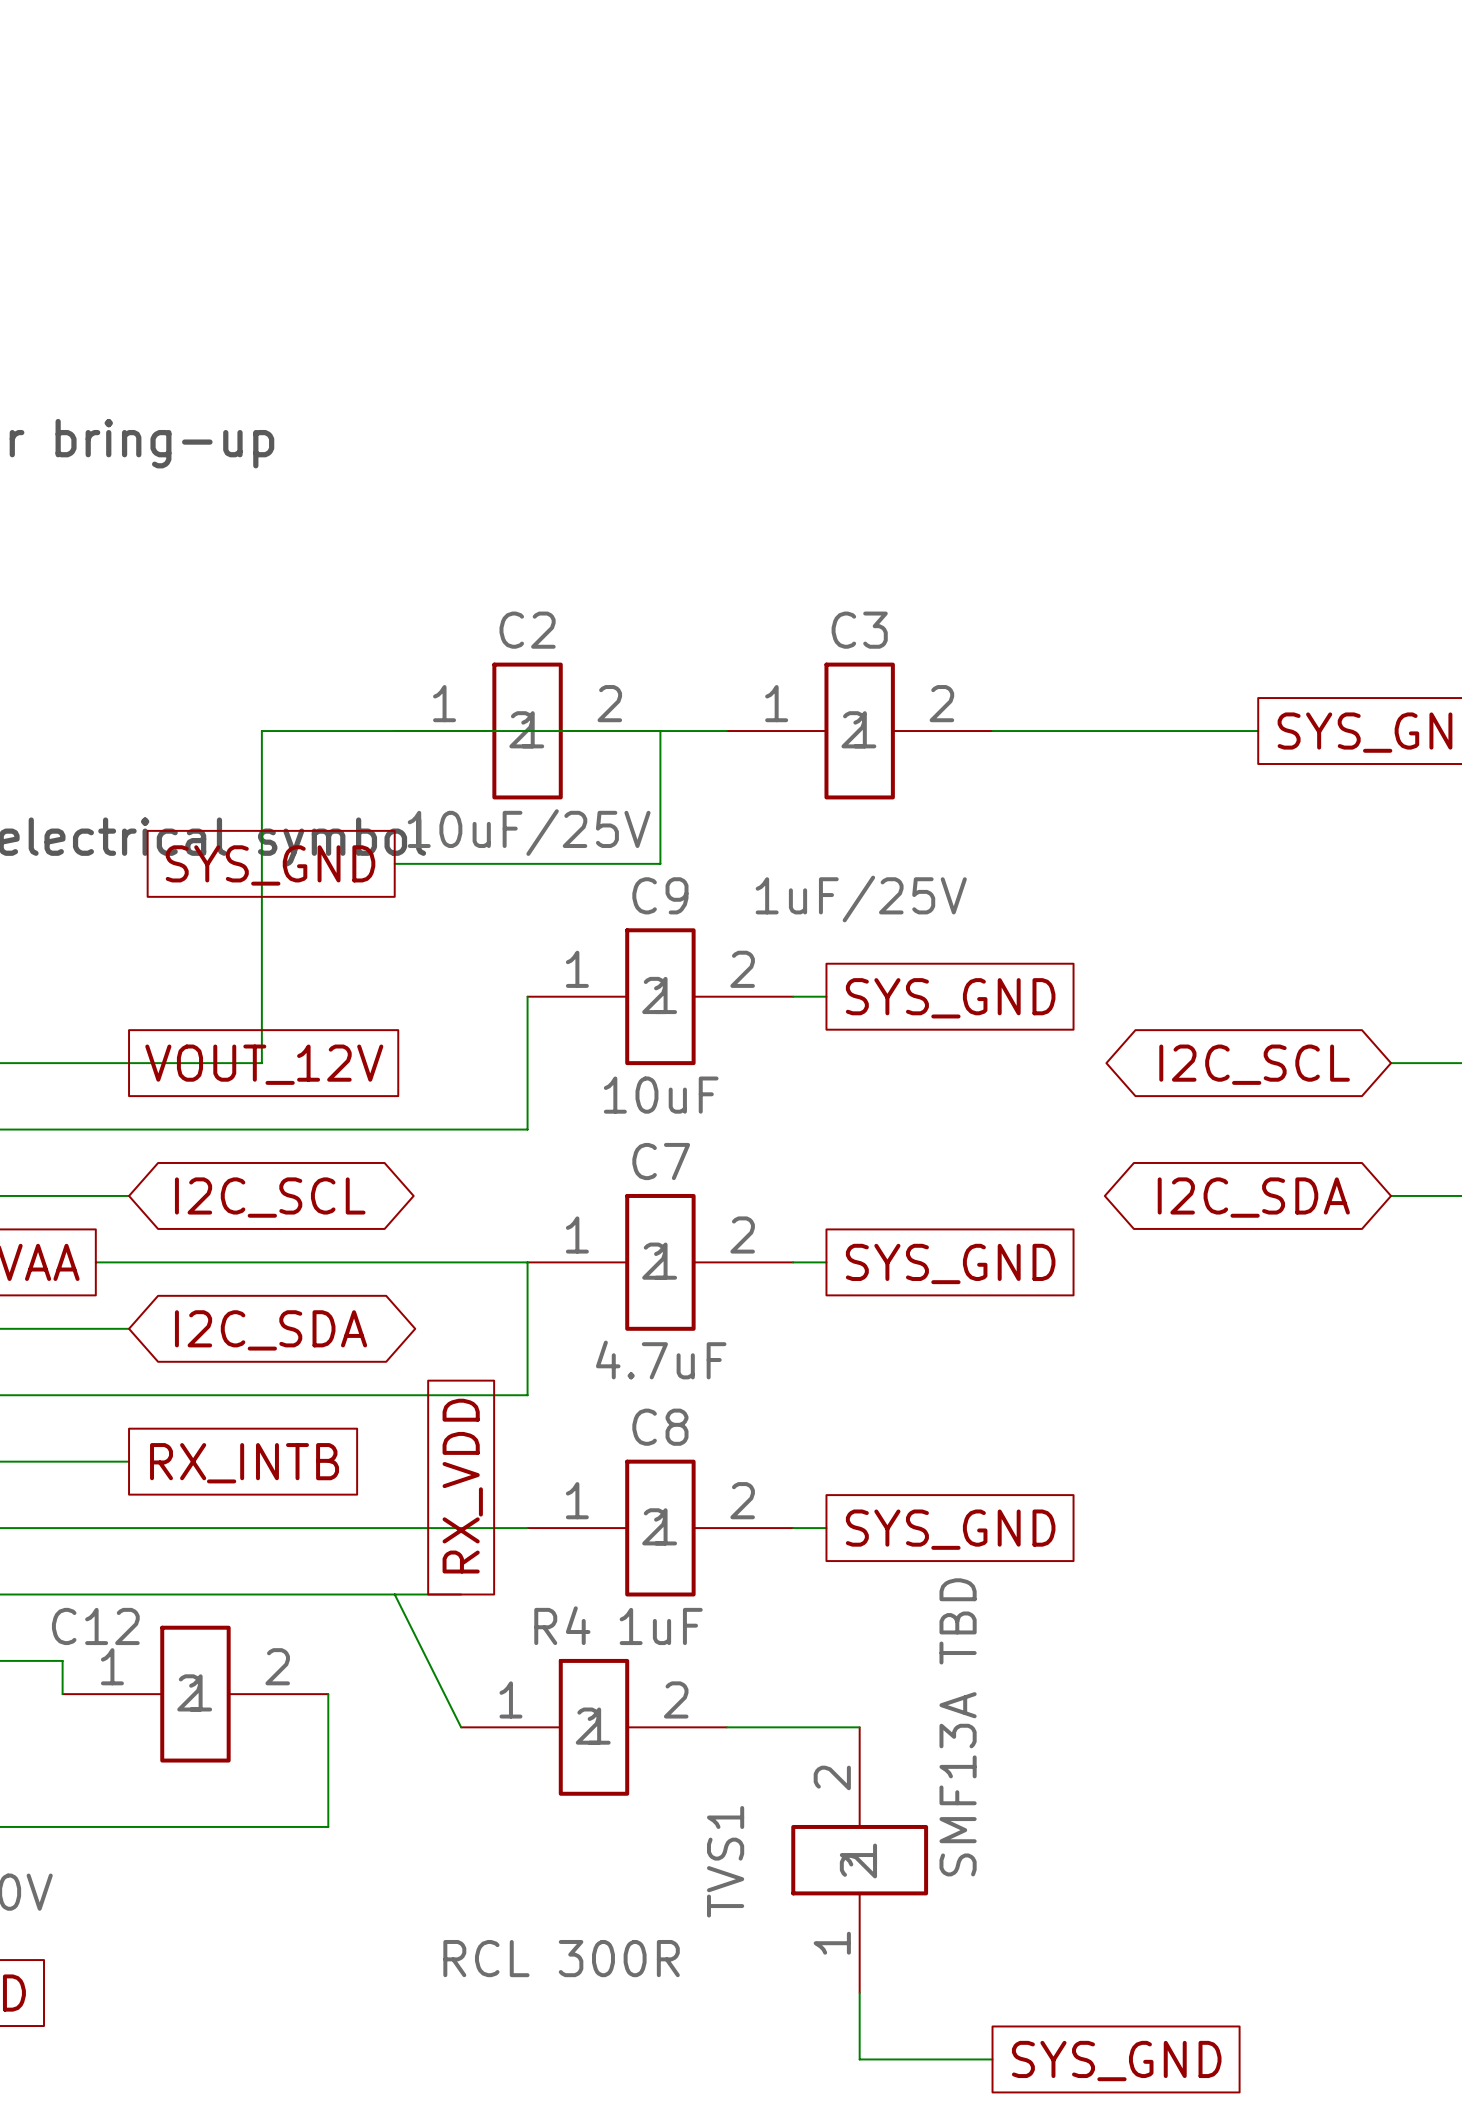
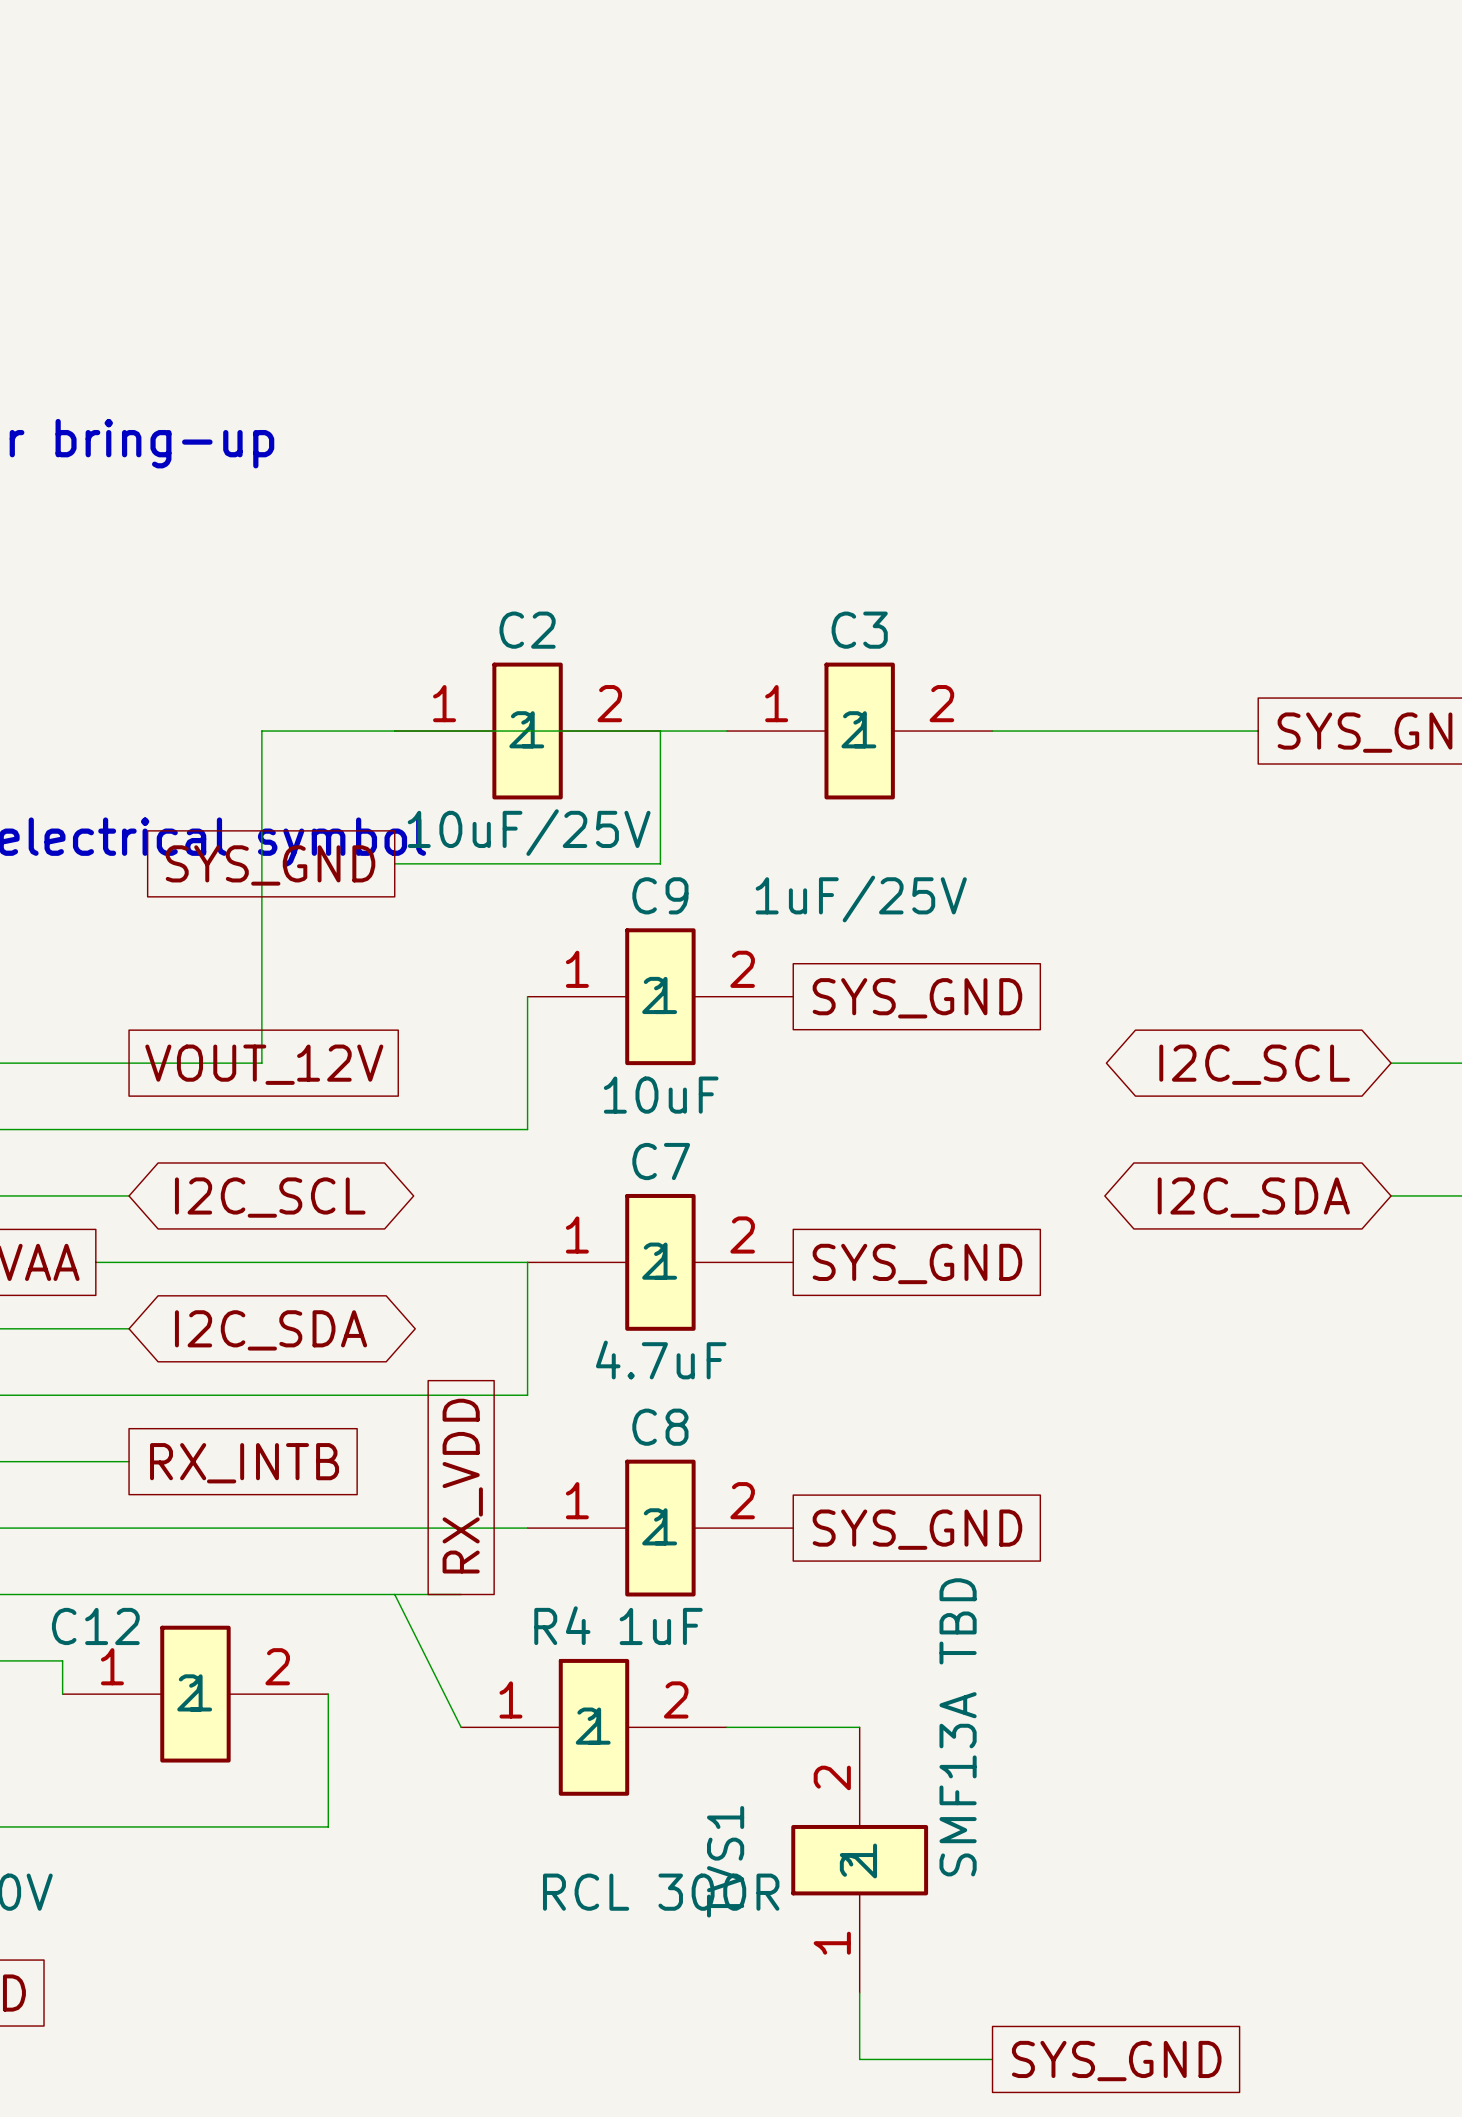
wire: (793, 996) (826, 996) -> none
global label position: SYS_GND (950, 998) -> SYS_GND (917, 998)
wire: (793, 1262) (826, 1262) -> none
global label position: SYS_GND (950, 1263) -> SYS_GND (917, 1263)
wire: (793, 1528) (826, 1528) -> none
global label position: SYS_GND (950, 1529) -> SYS_GND (917, 1529)
R4 value position: RCL 300R (561, 1958) -> RCL 300R (661, 1892)

